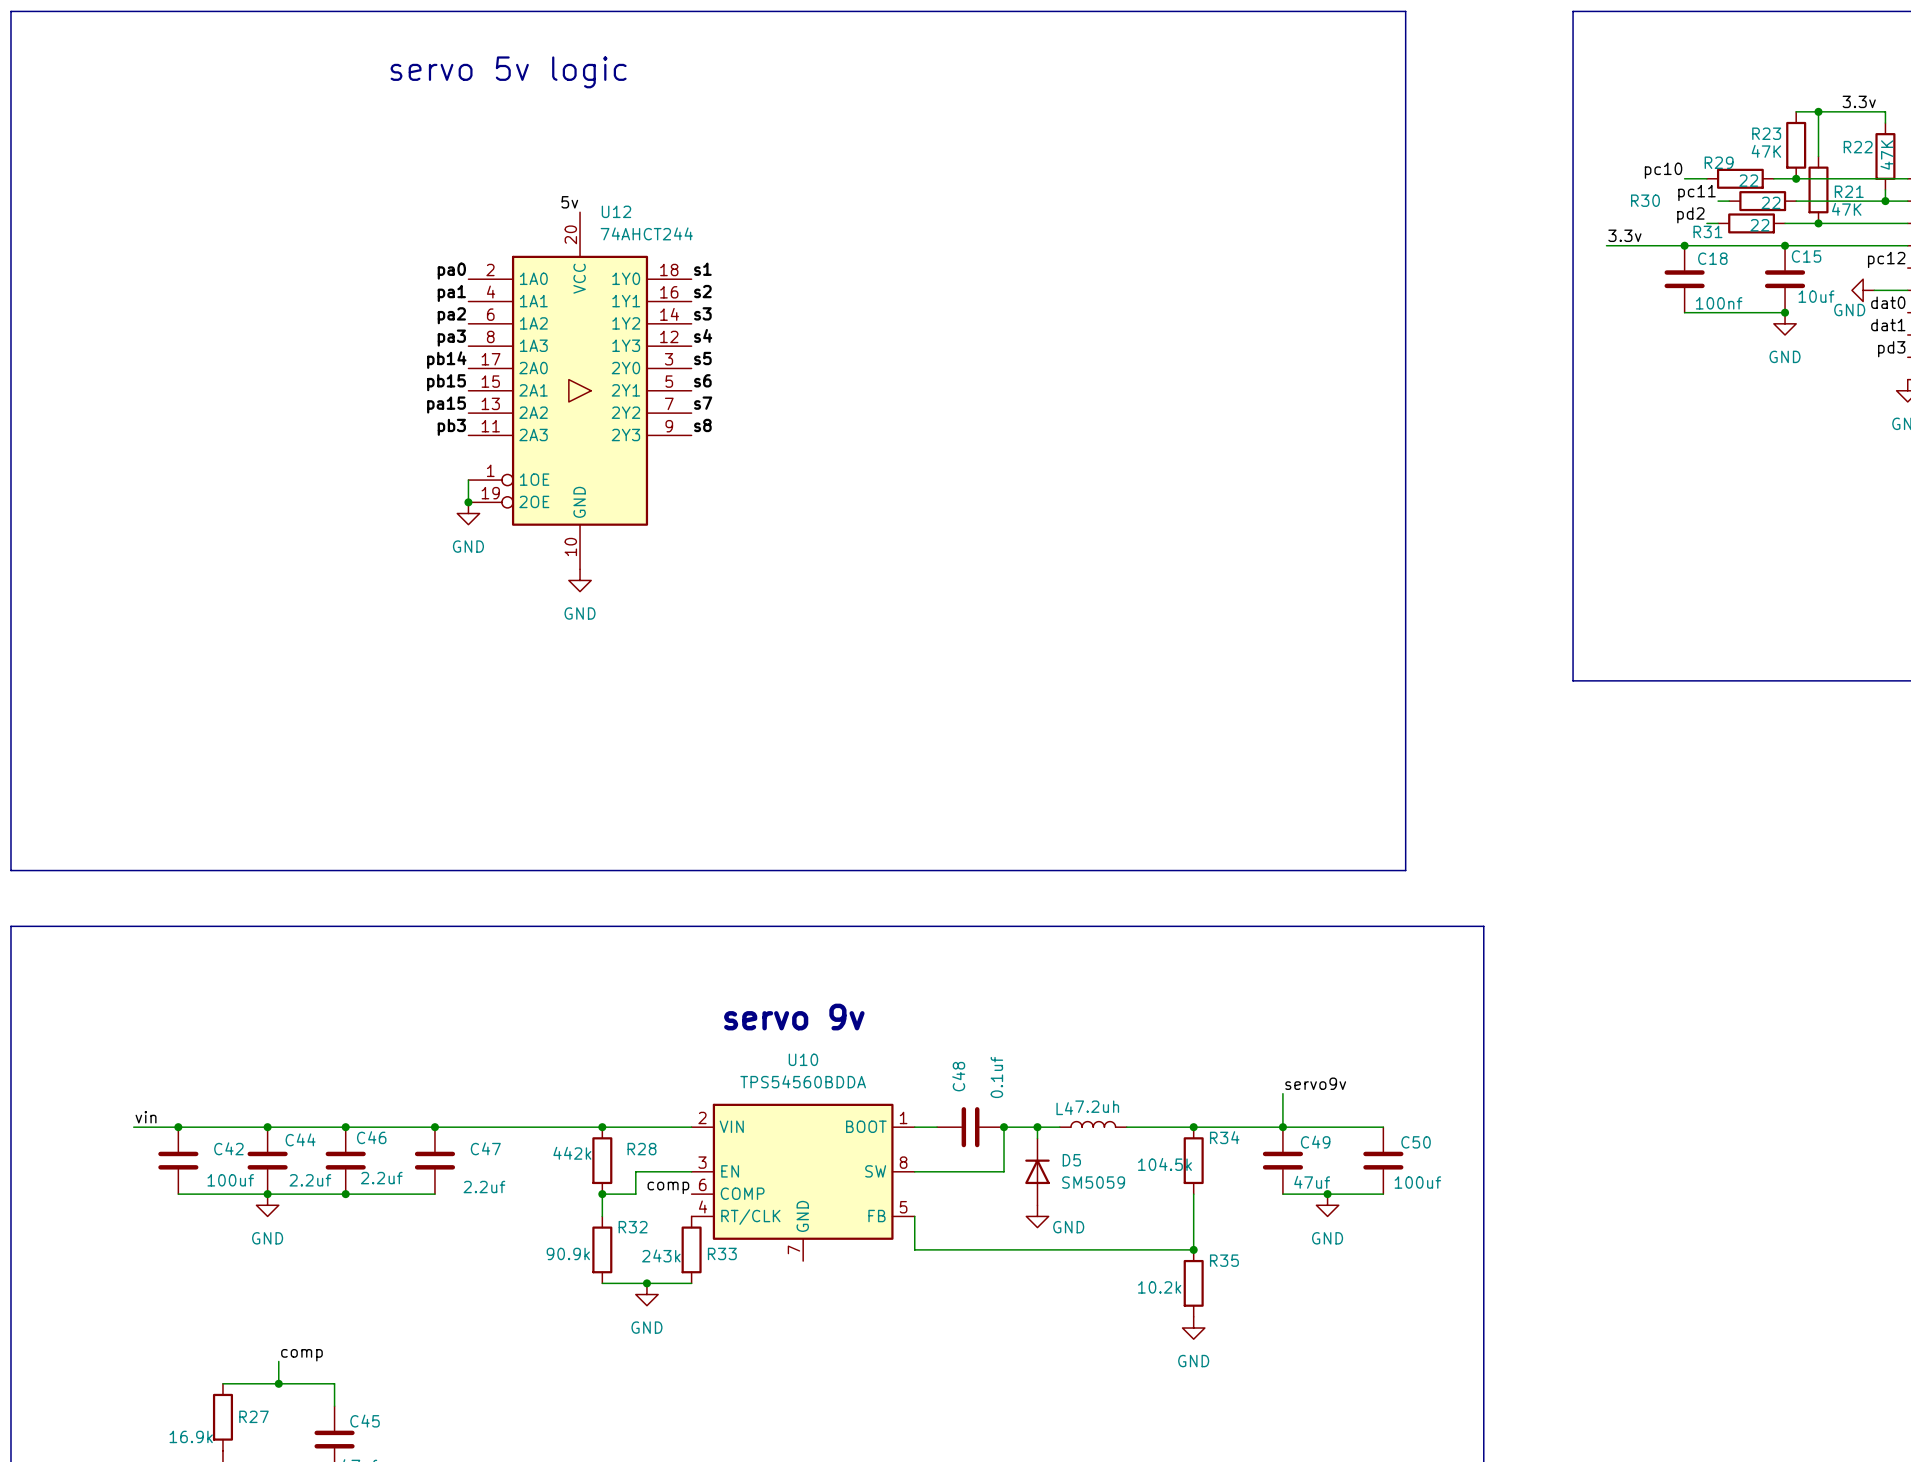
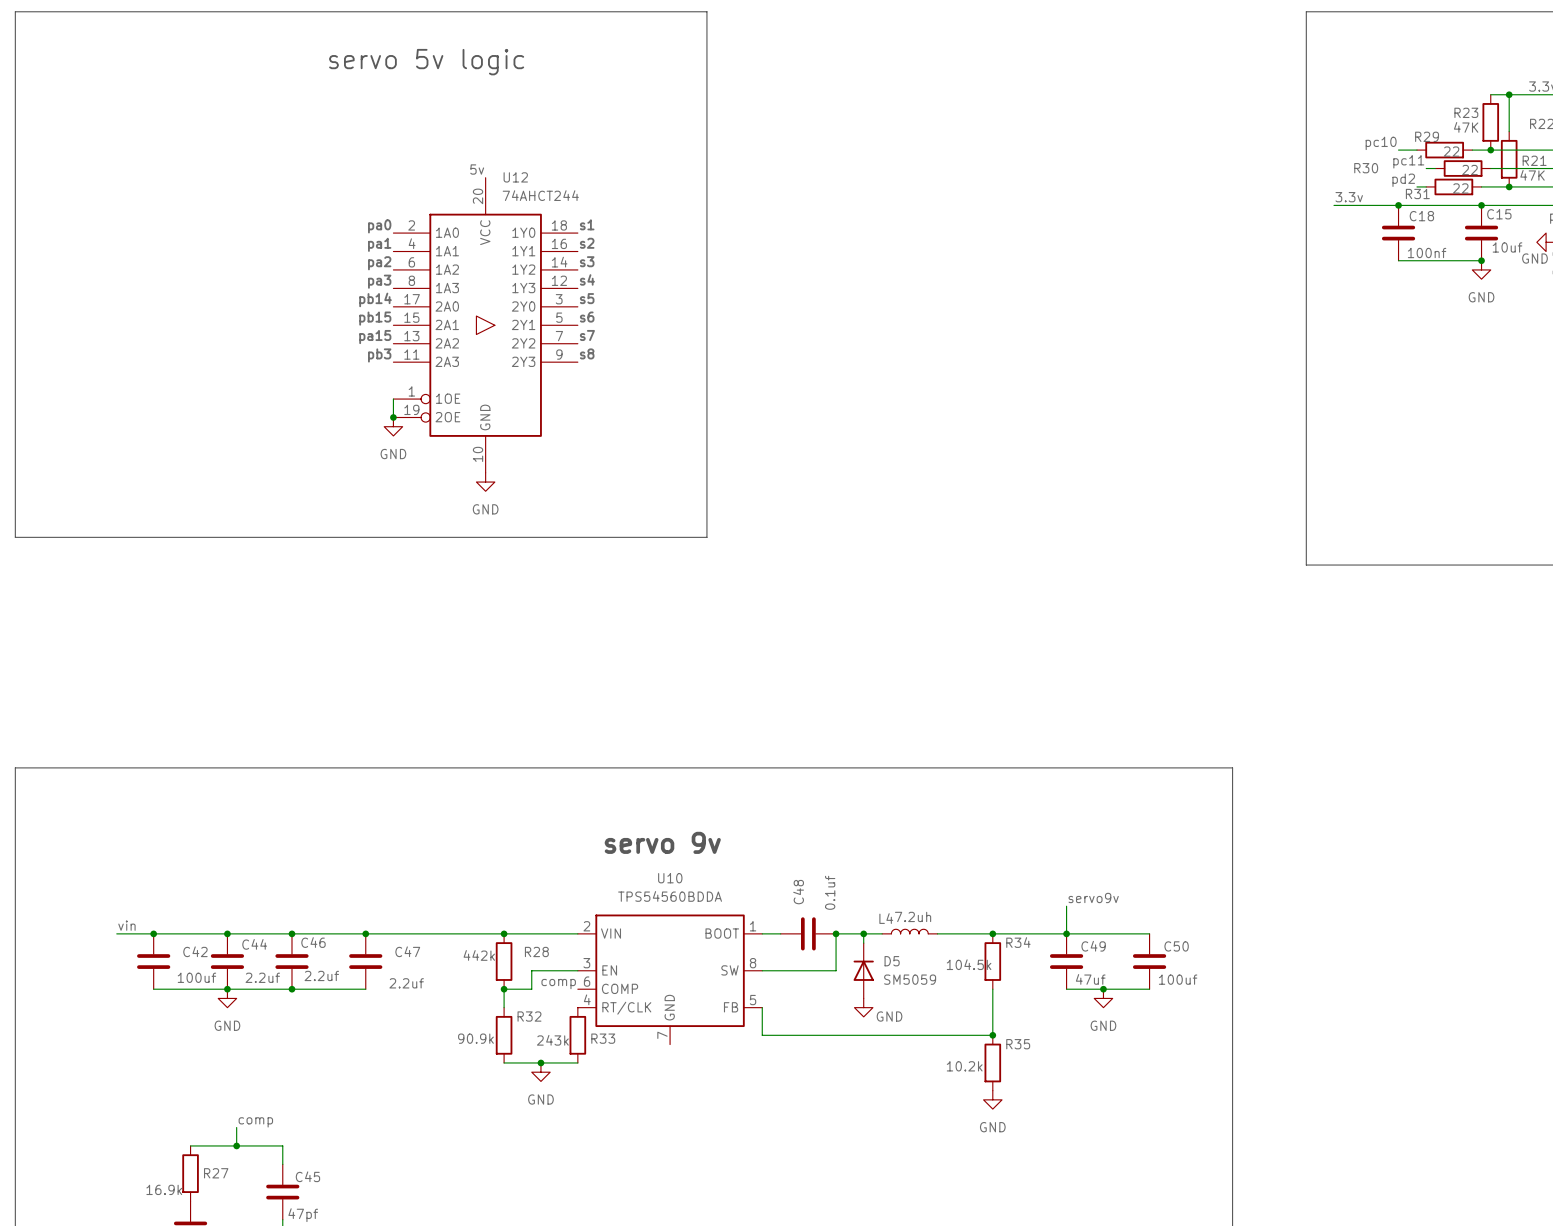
line: (847, 11) (1405, 11) (1405, 870) (10, 870) (10, 647) -> (706, 11) (706, 537) (15, 537)

